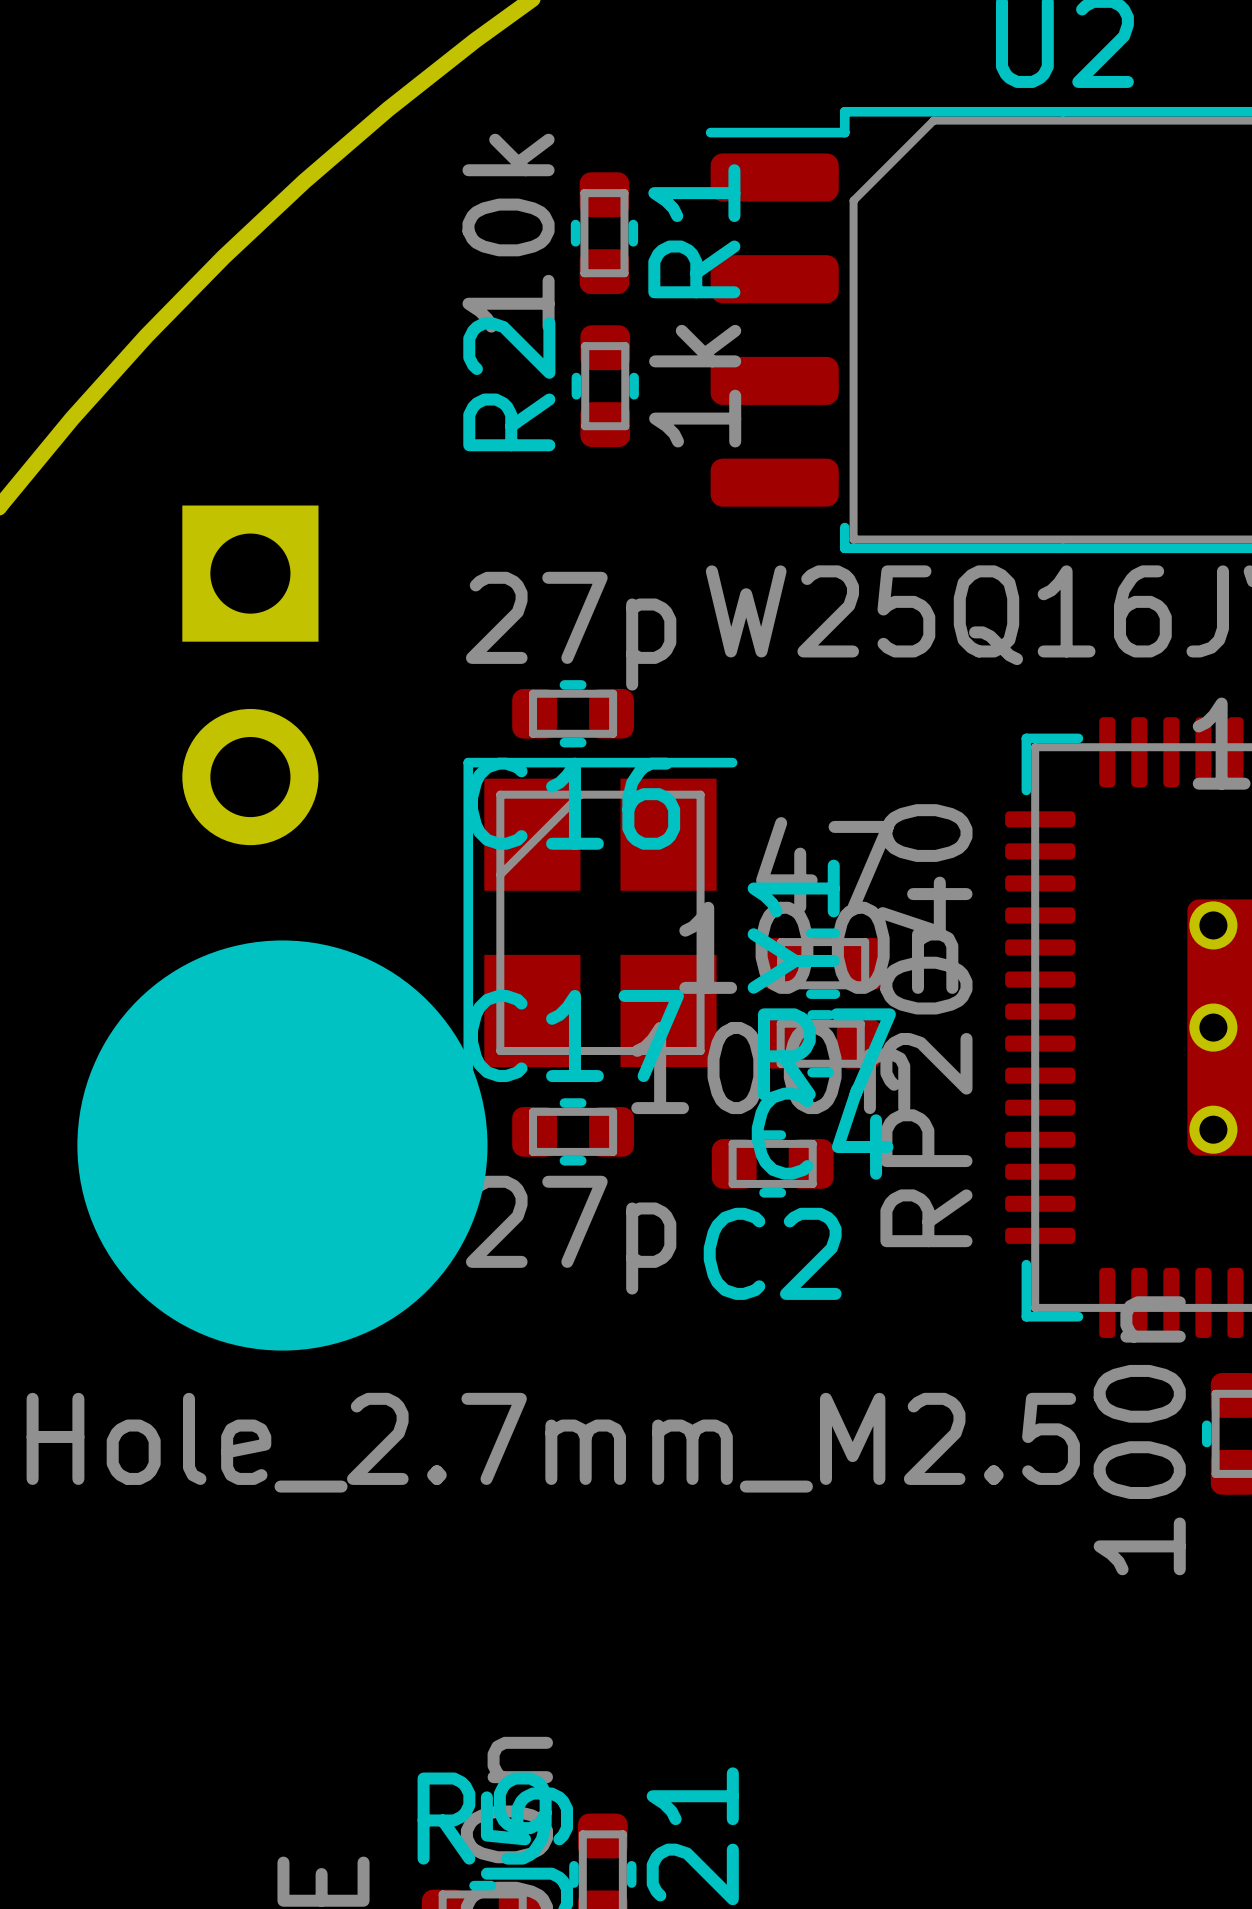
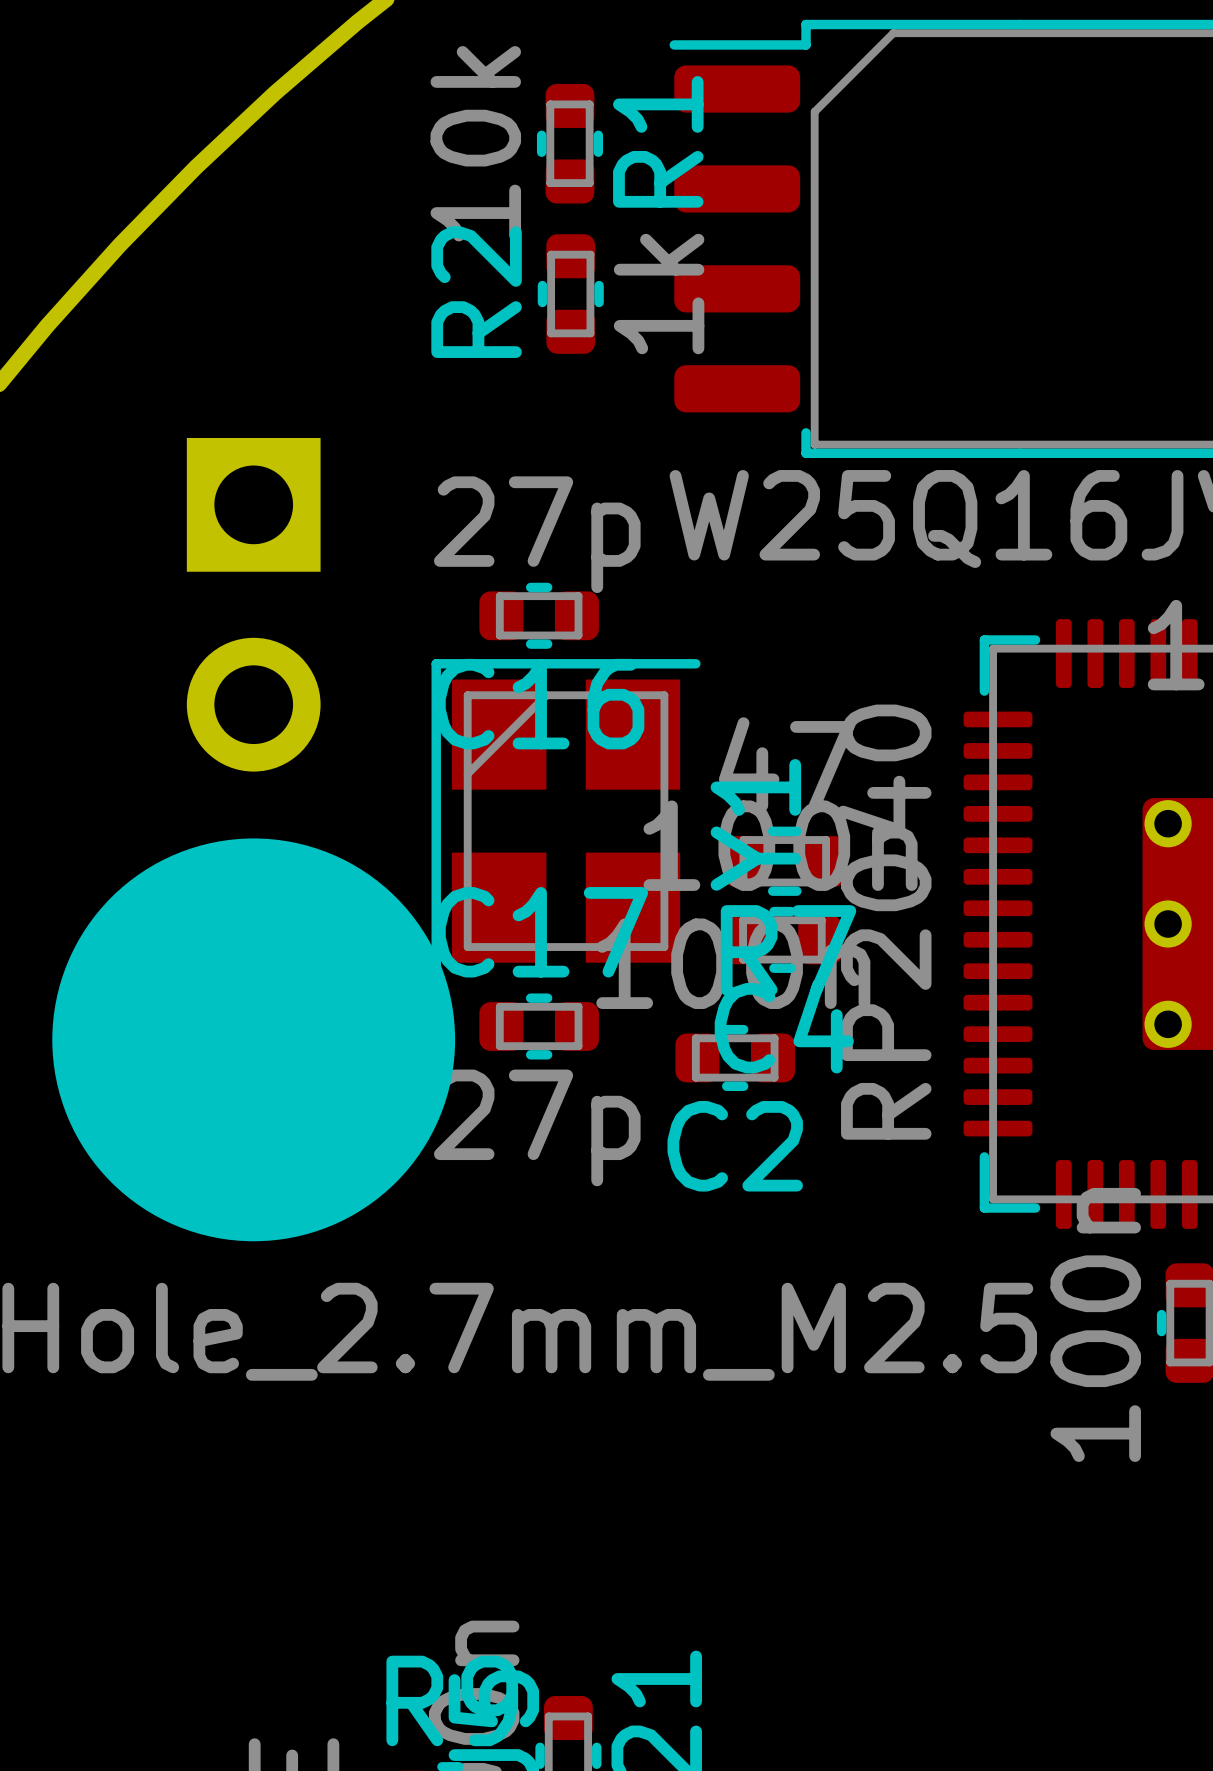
part position: (250, 675) -> (253, 604)

